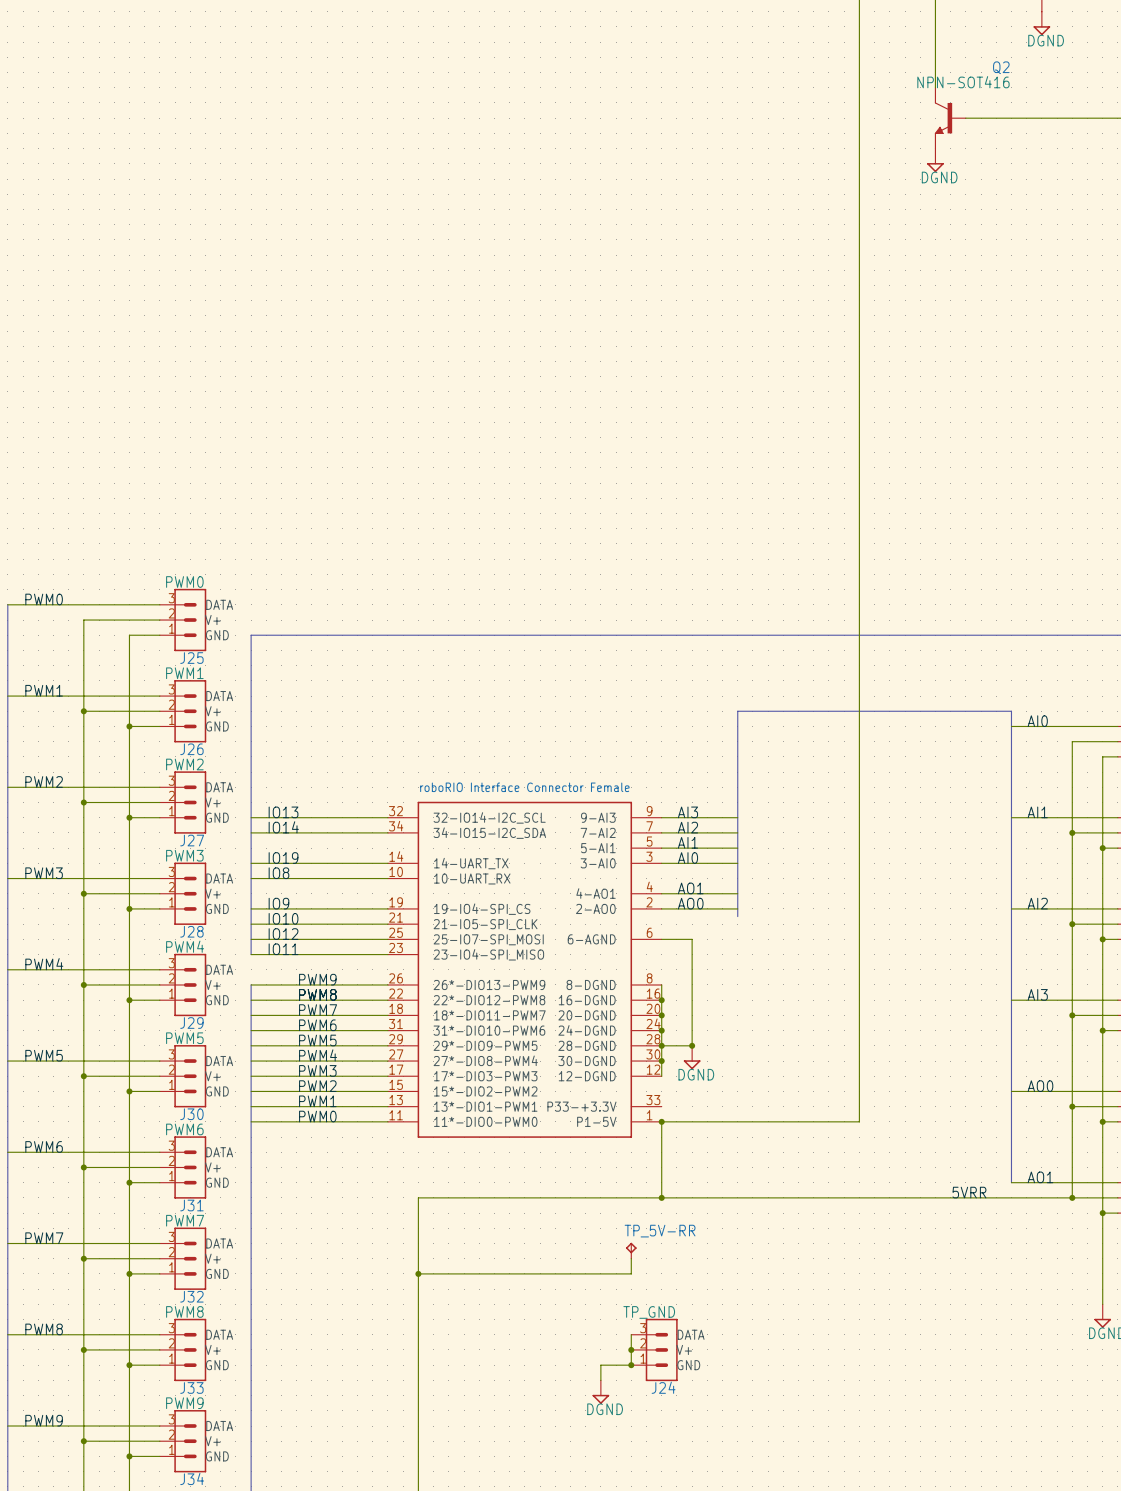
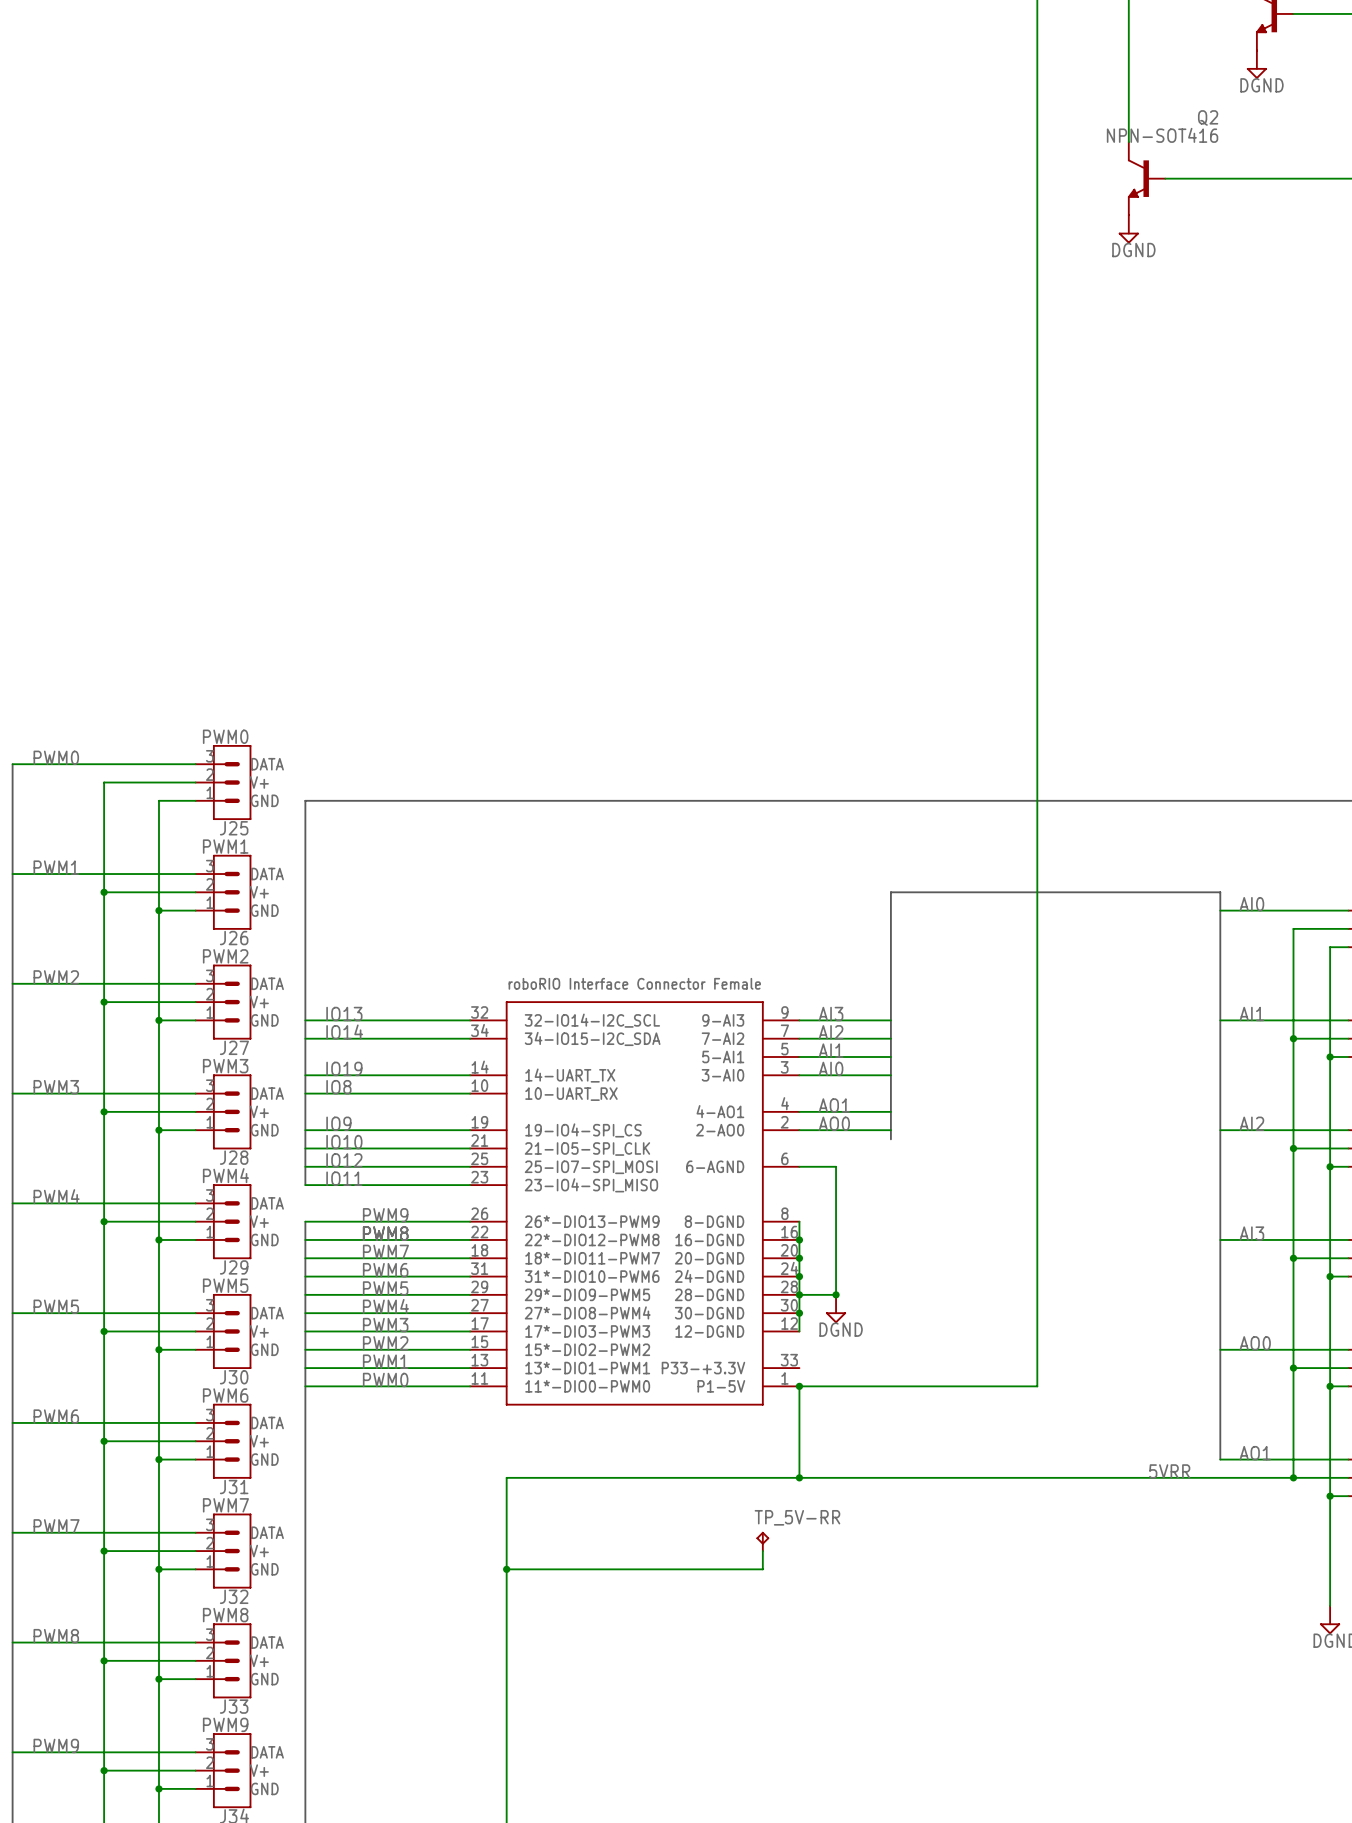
wire: (631, 1334) (631, 1365) (600, 1365) (600, 1380) -> none
junction: (631, 1349) -> none
J24: TP_GND (654, 1349) -> none
junction: (631, 1365) -> none
power symbol: DGND (600, 1392) -> none

